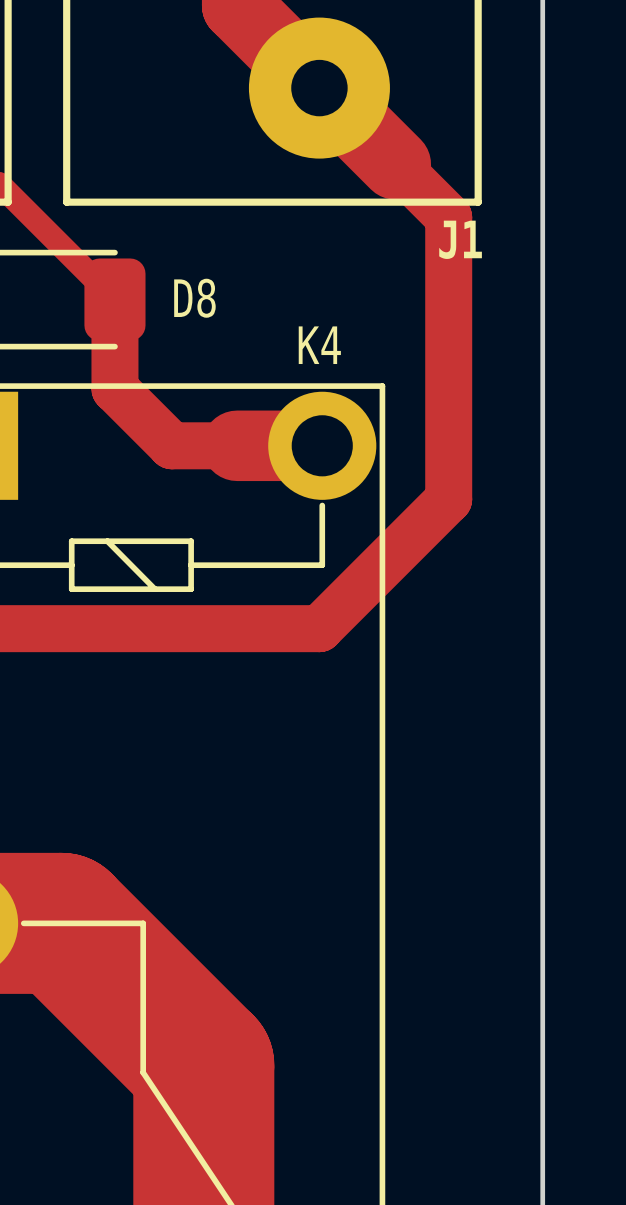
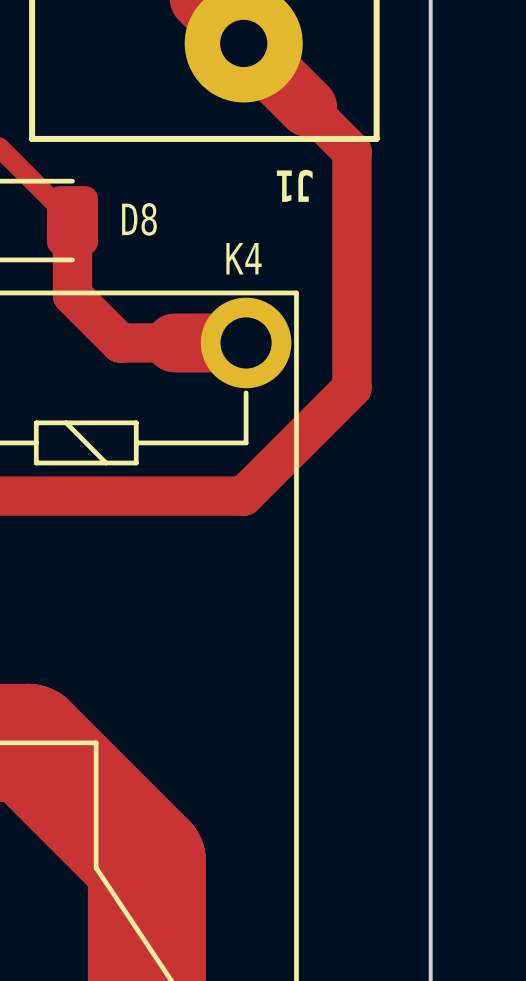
J1 name rotation: 0° (460, 239) -> 180° (294, 185)
J1 name position: J1 (460, 239) -> J1 (294, 185)

